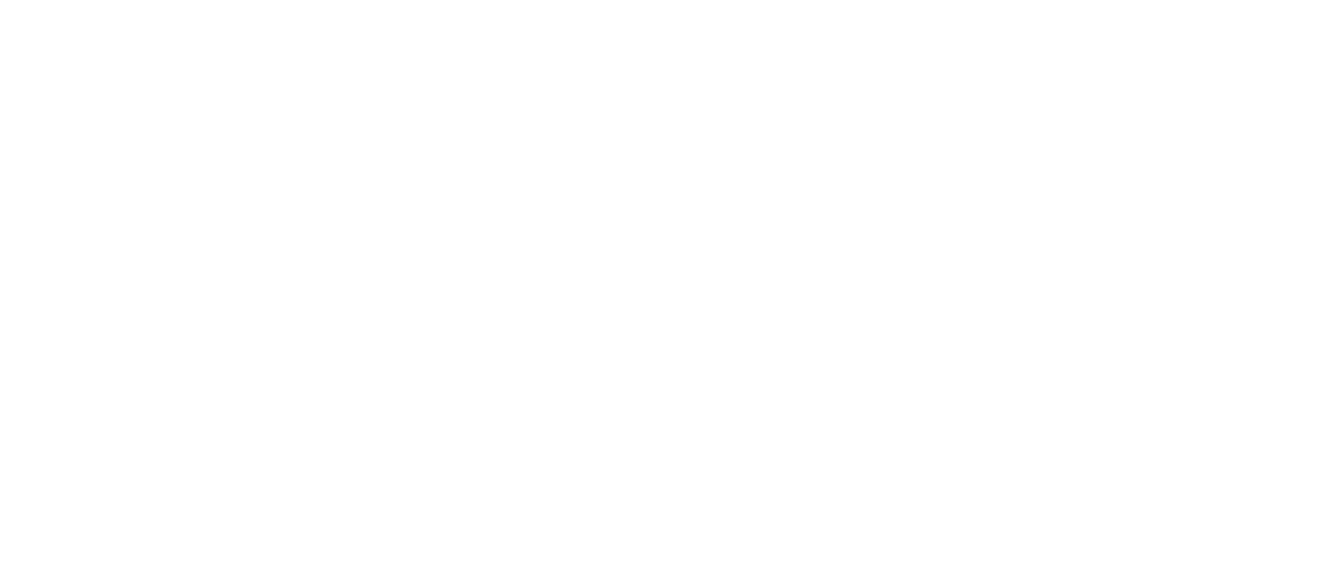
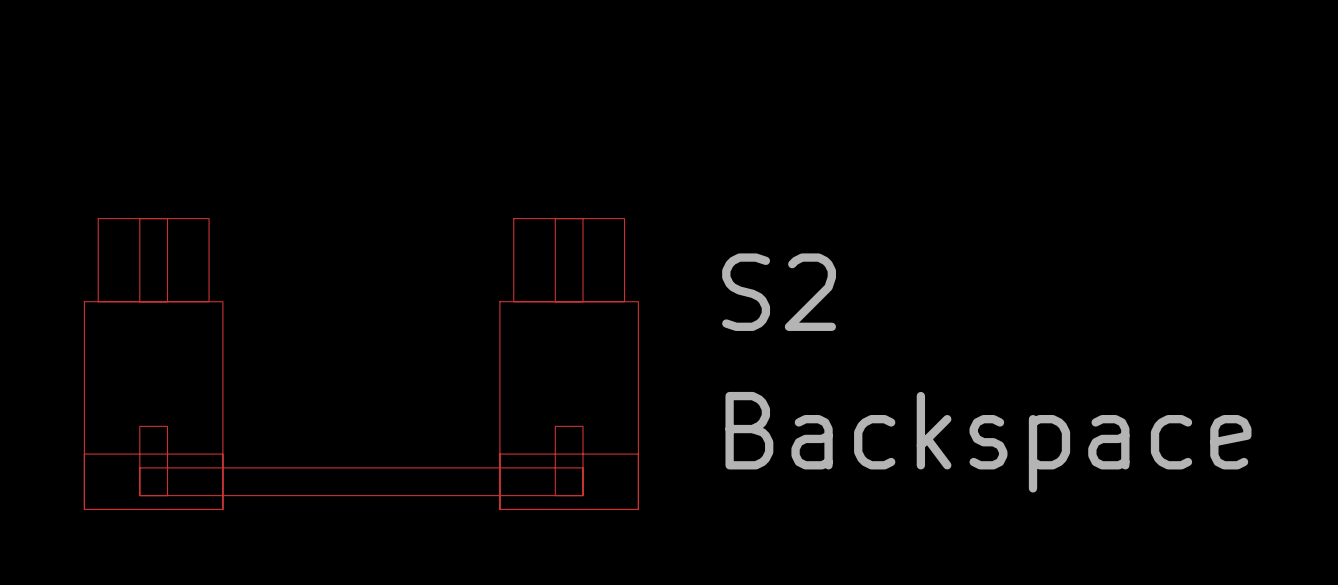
S2: none -> Backspace (361, 364)

